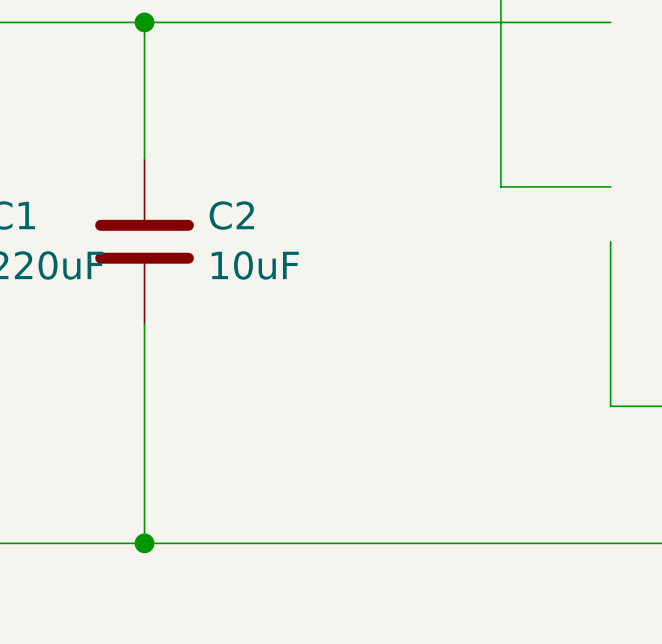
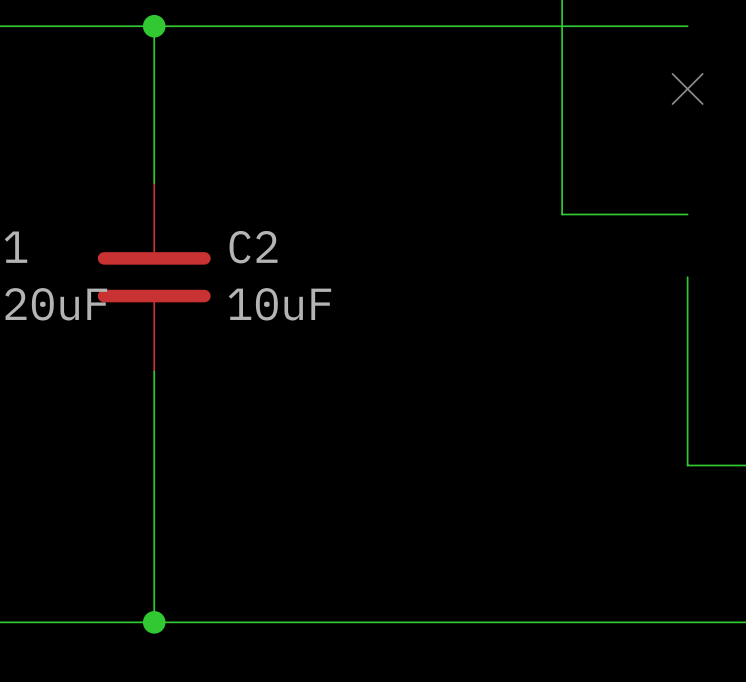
no-connect mark: none -> (687, 88)

